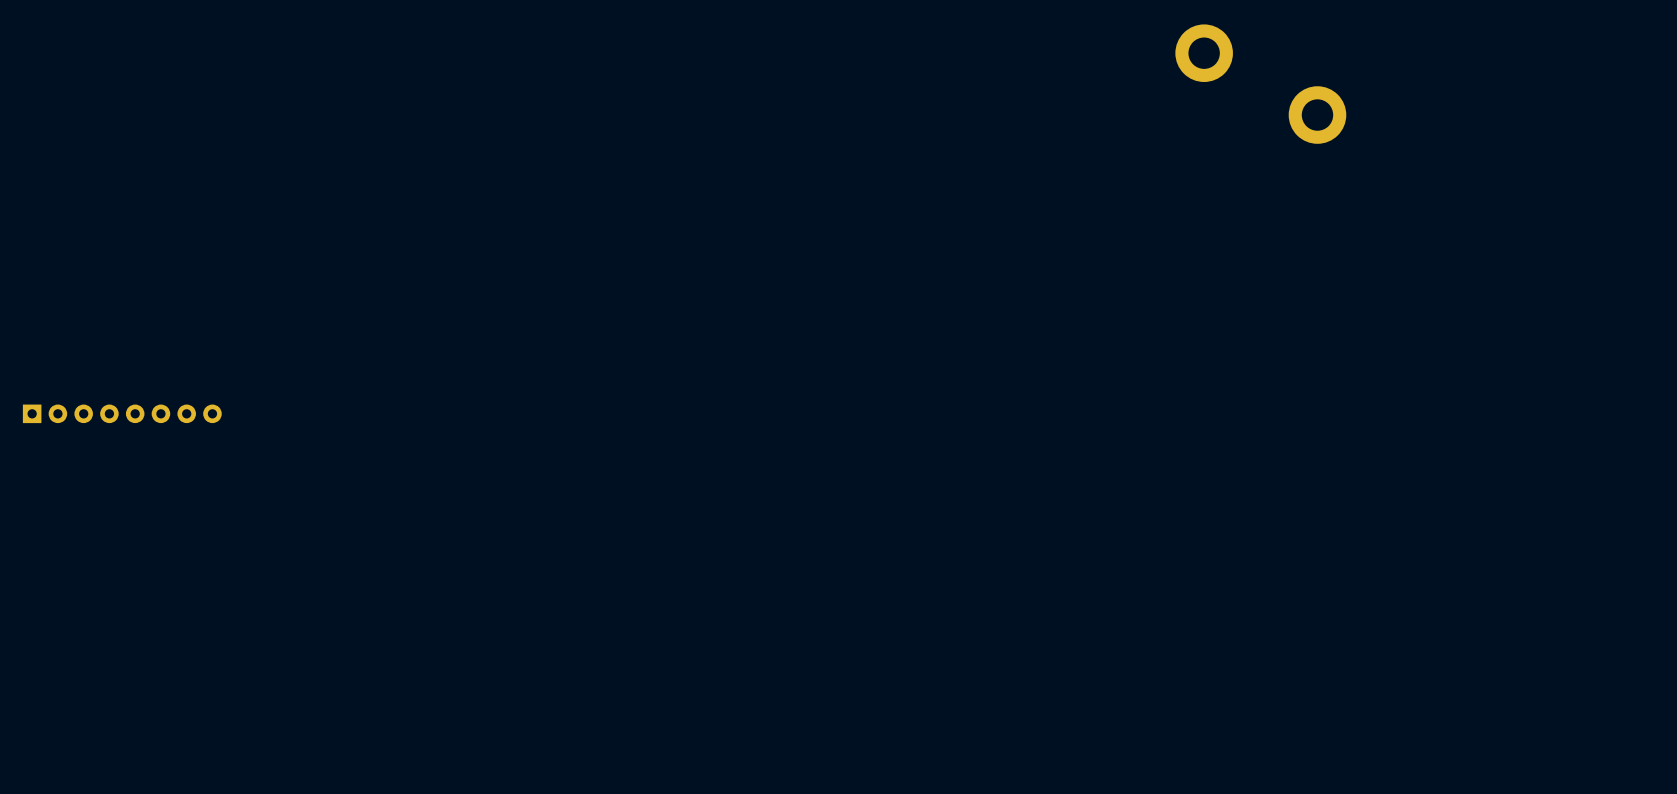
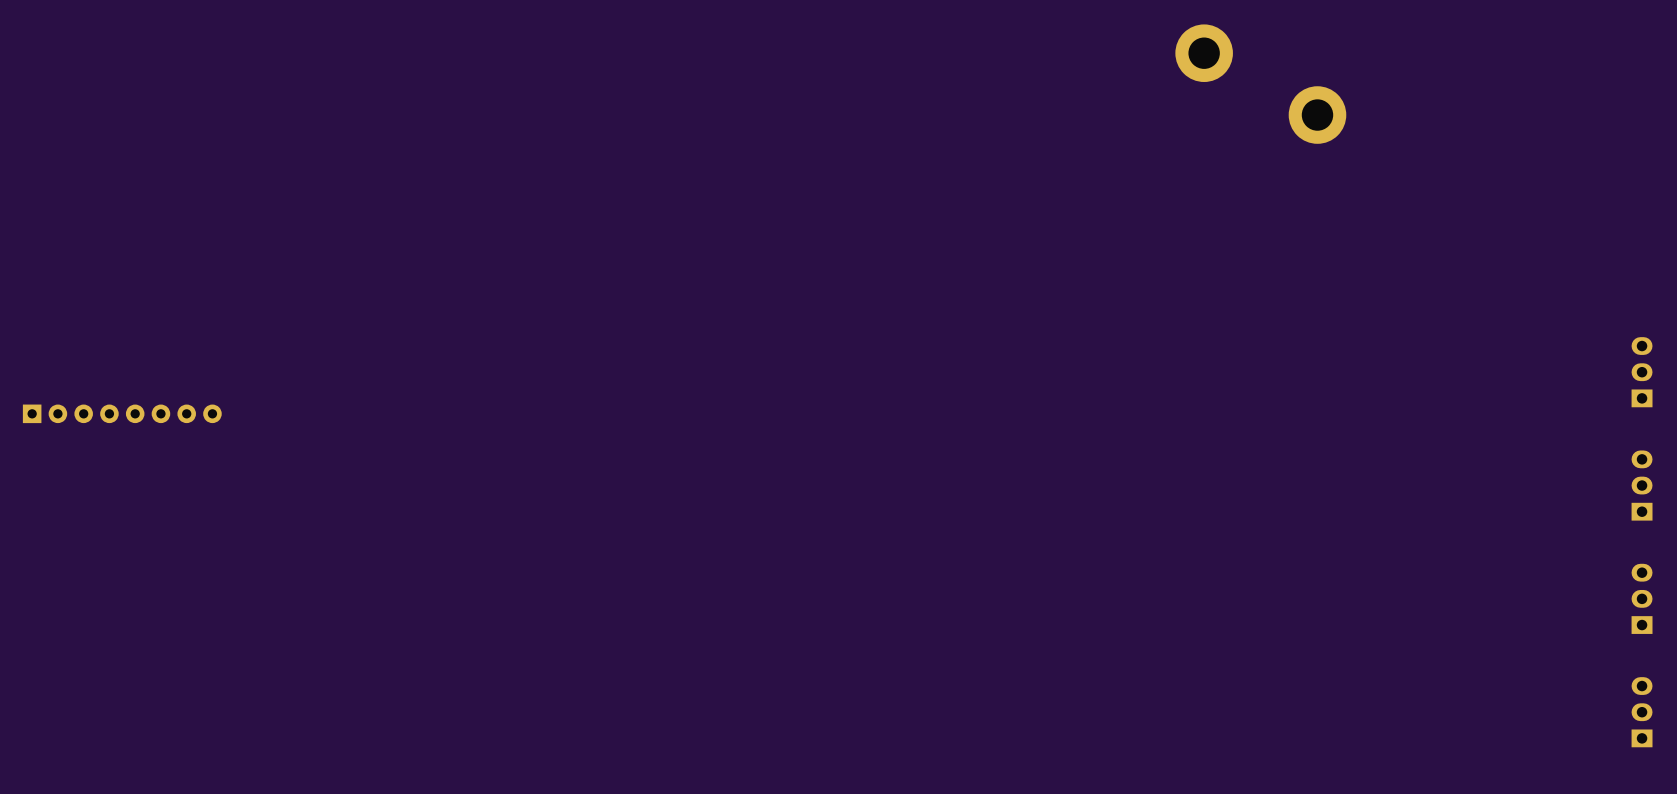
part: none -> (1642, 372)
part: none -> (1642, 485)
part: none -> (1642, 598)
part: none -> (1642, 712)

